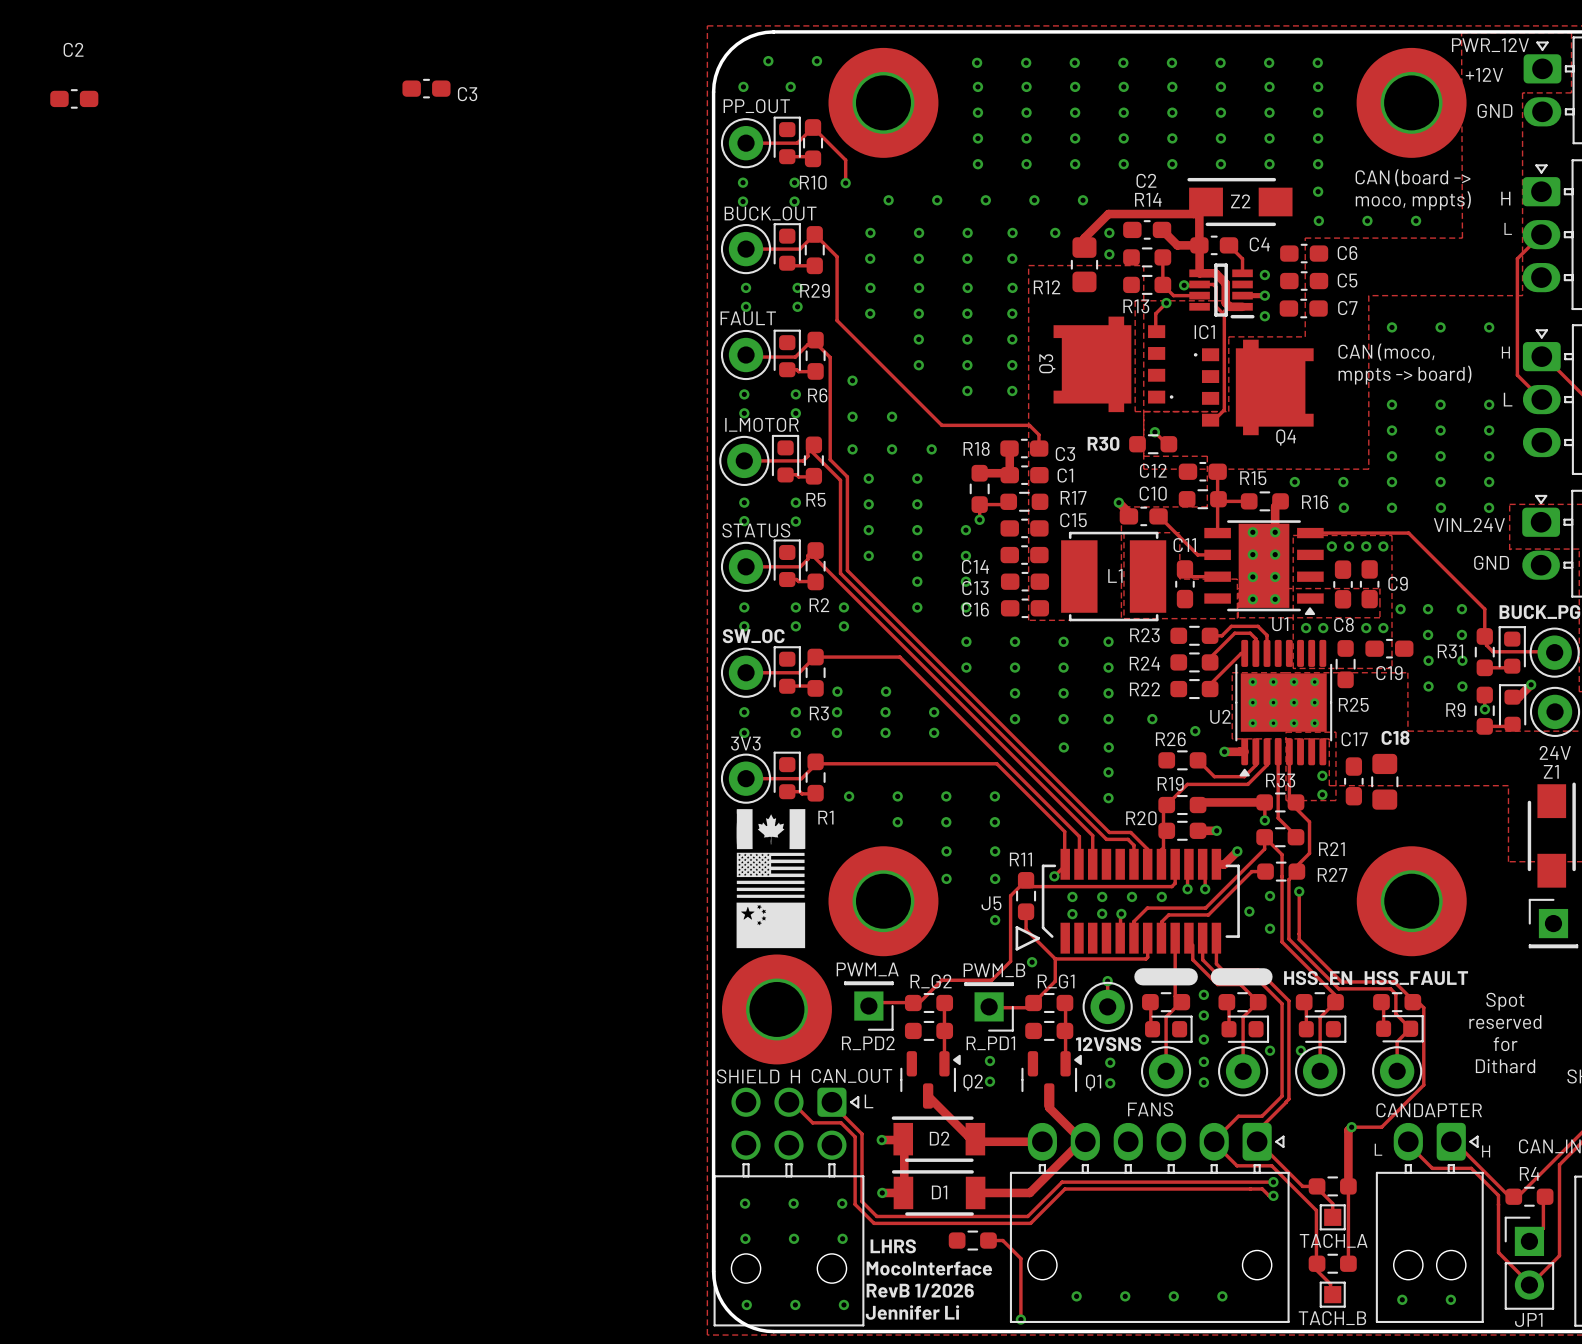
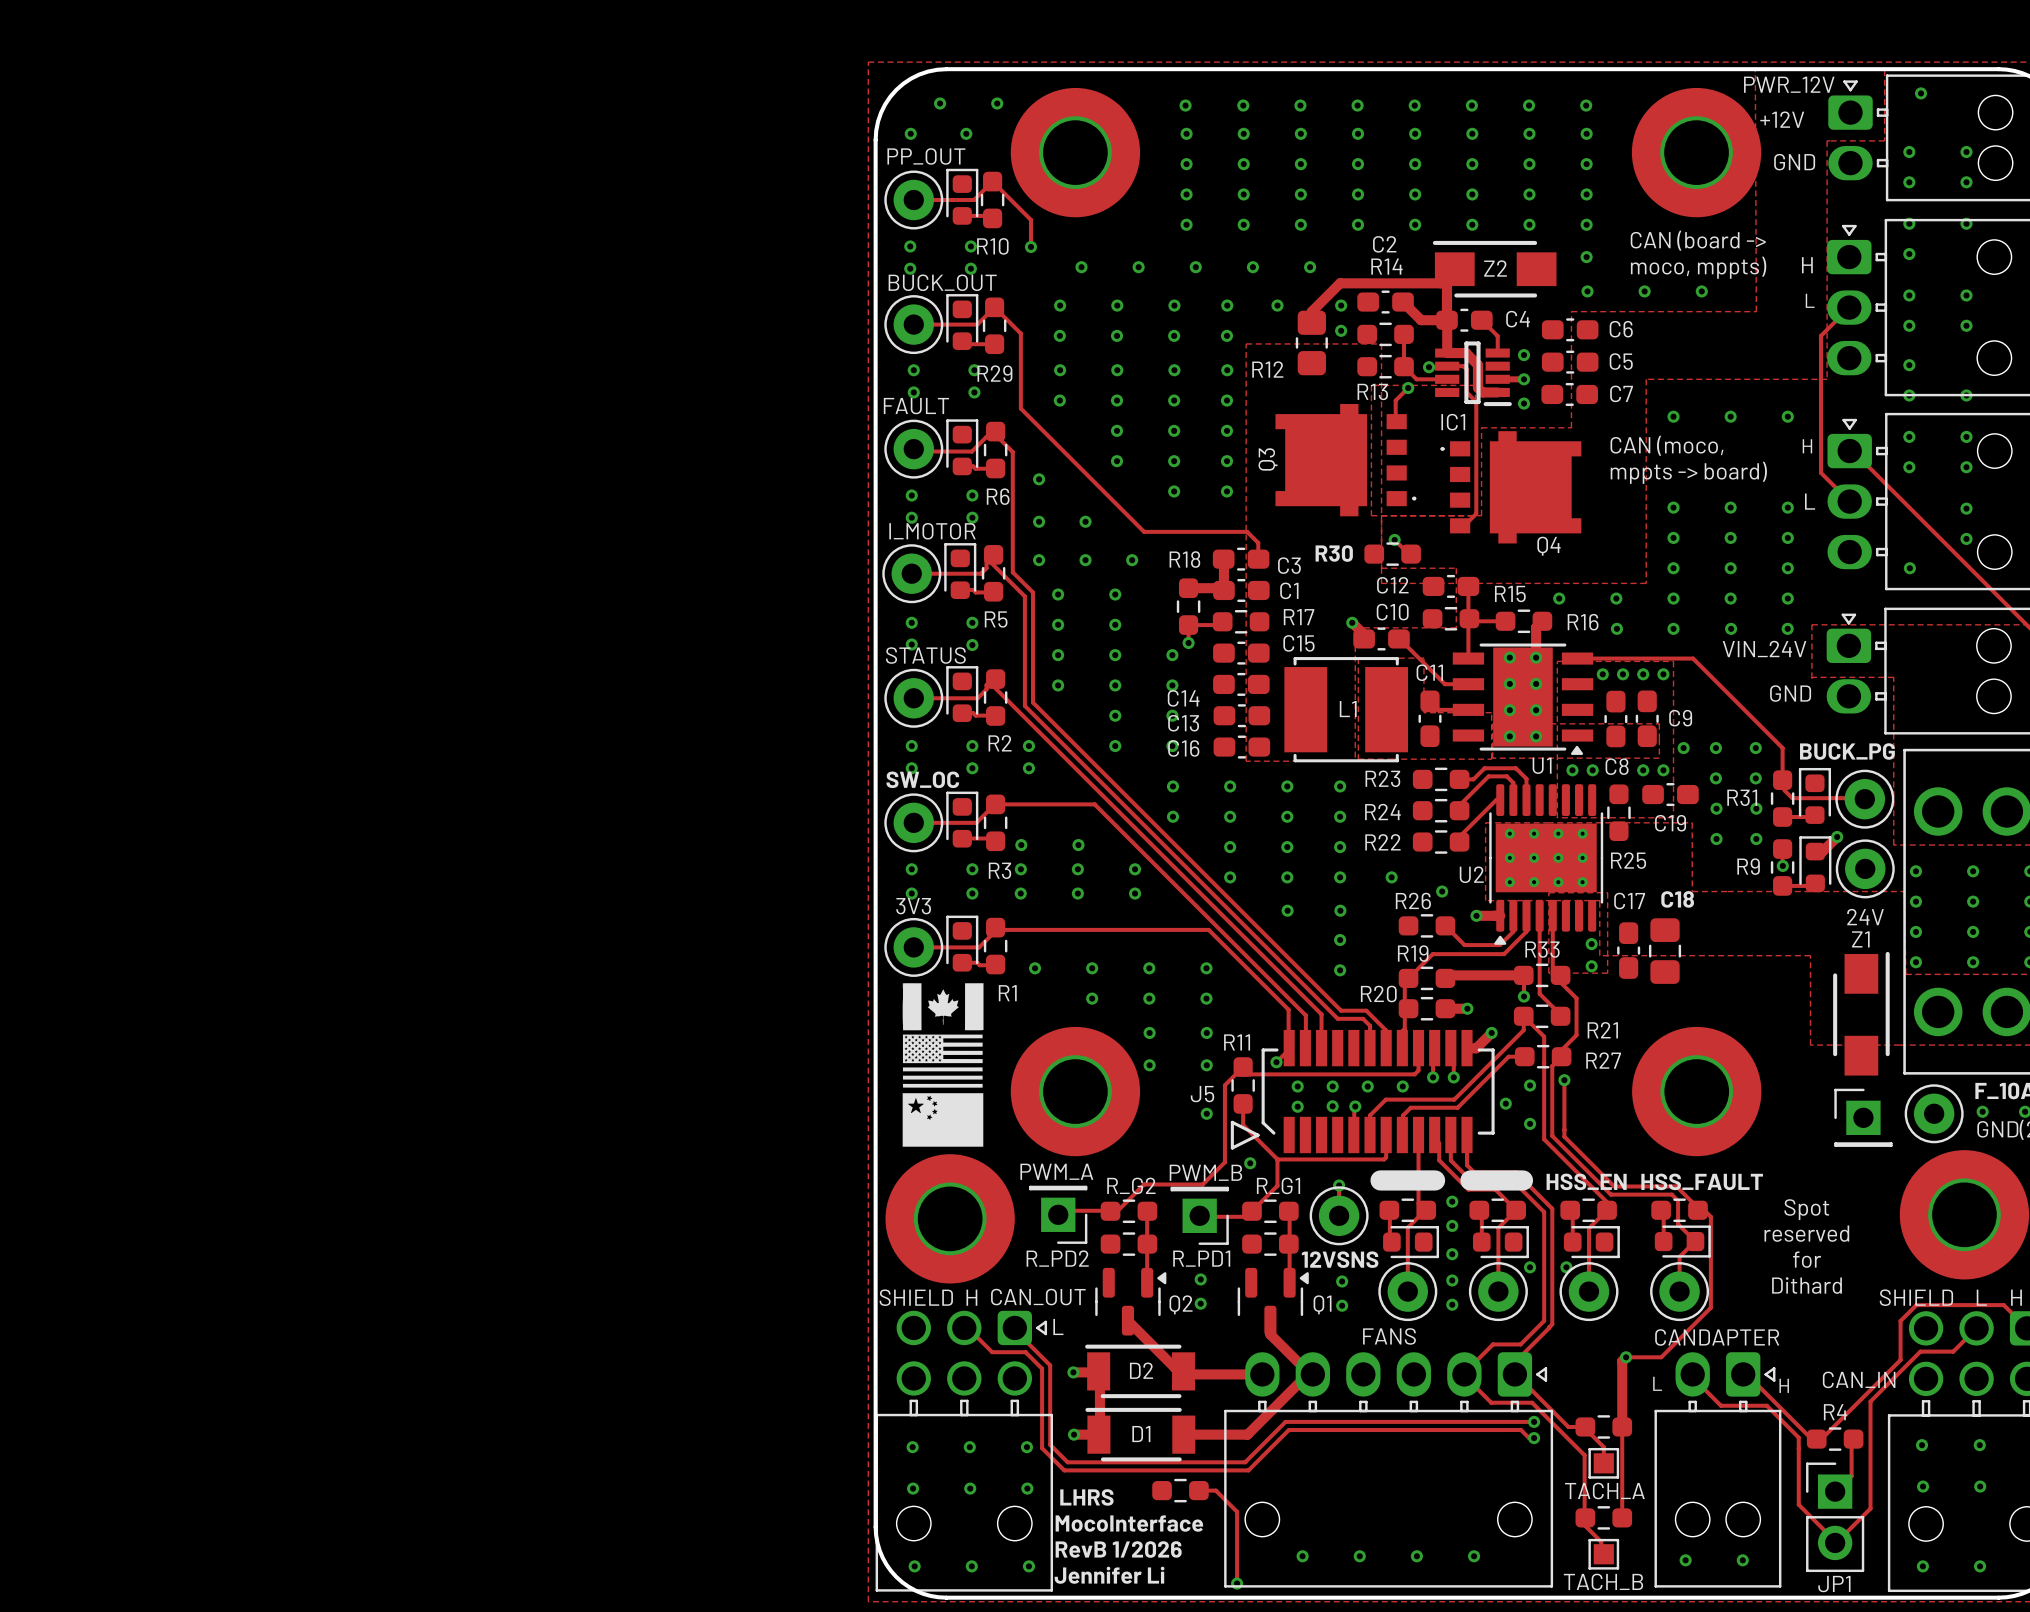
C3: (426, 88) -> none
C2: (74, 98) -> none

